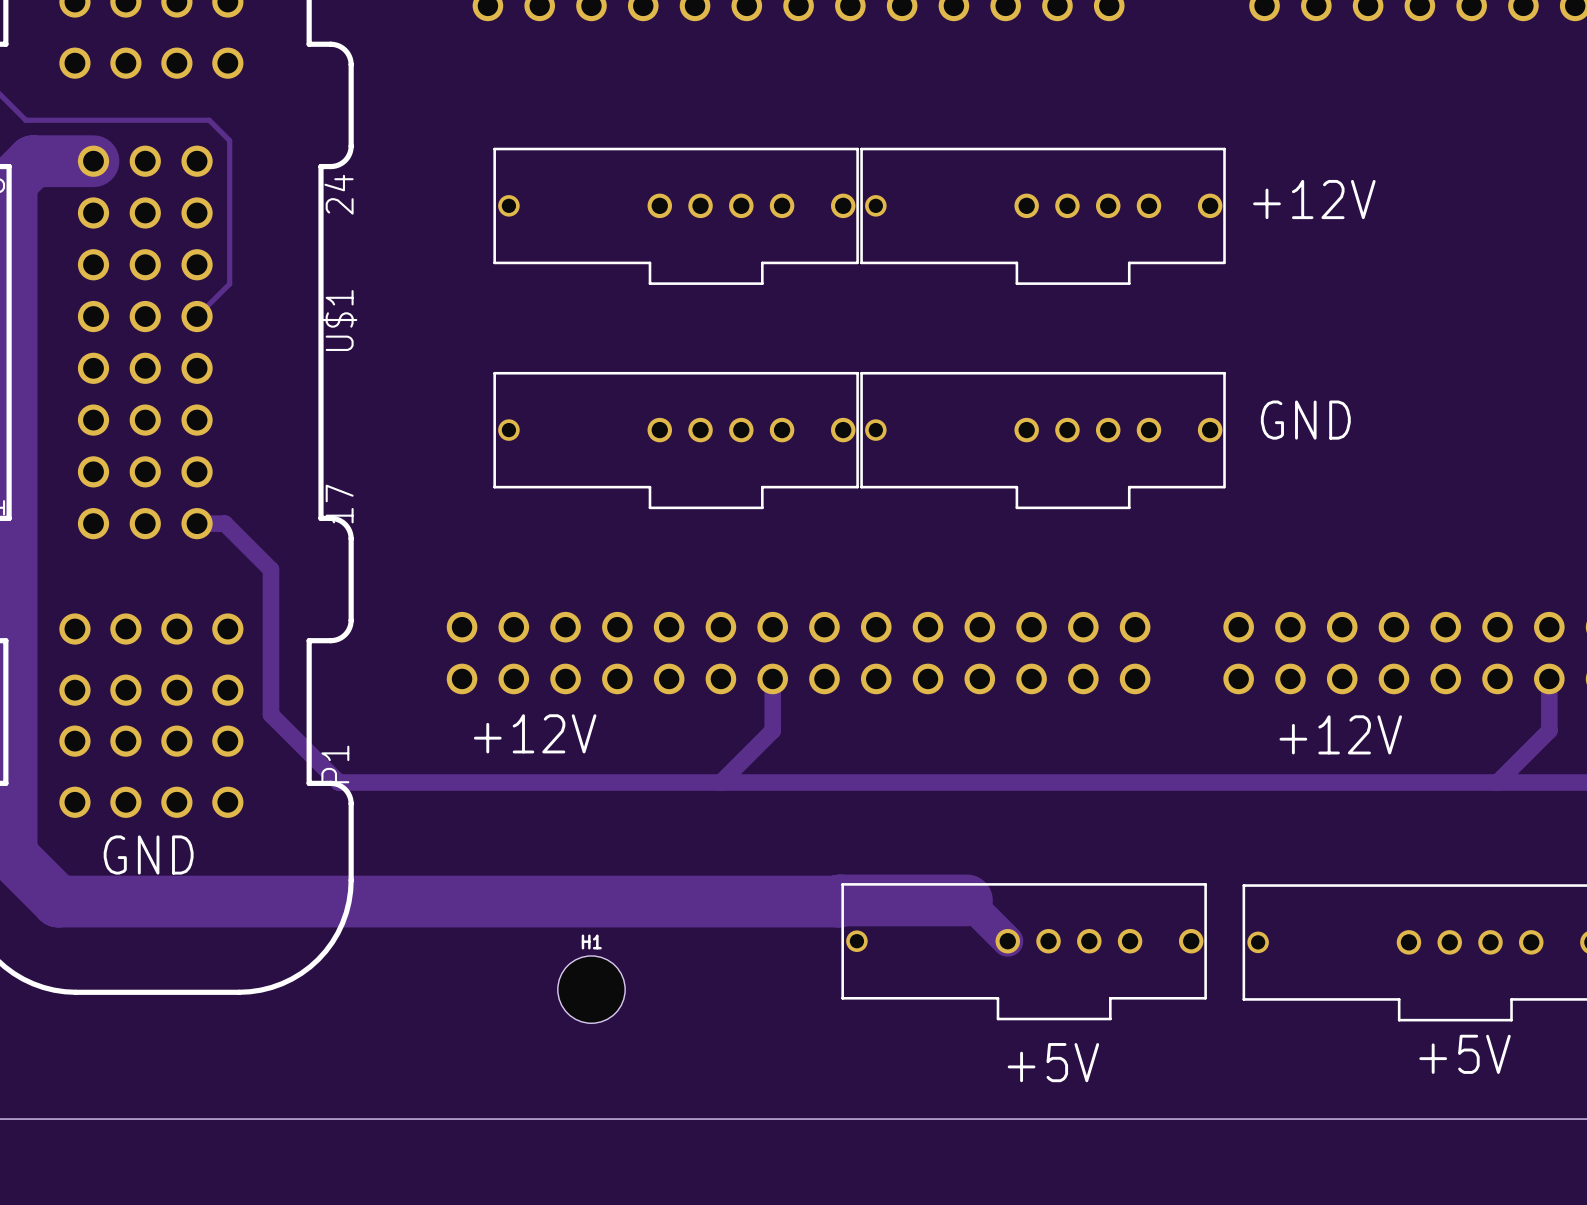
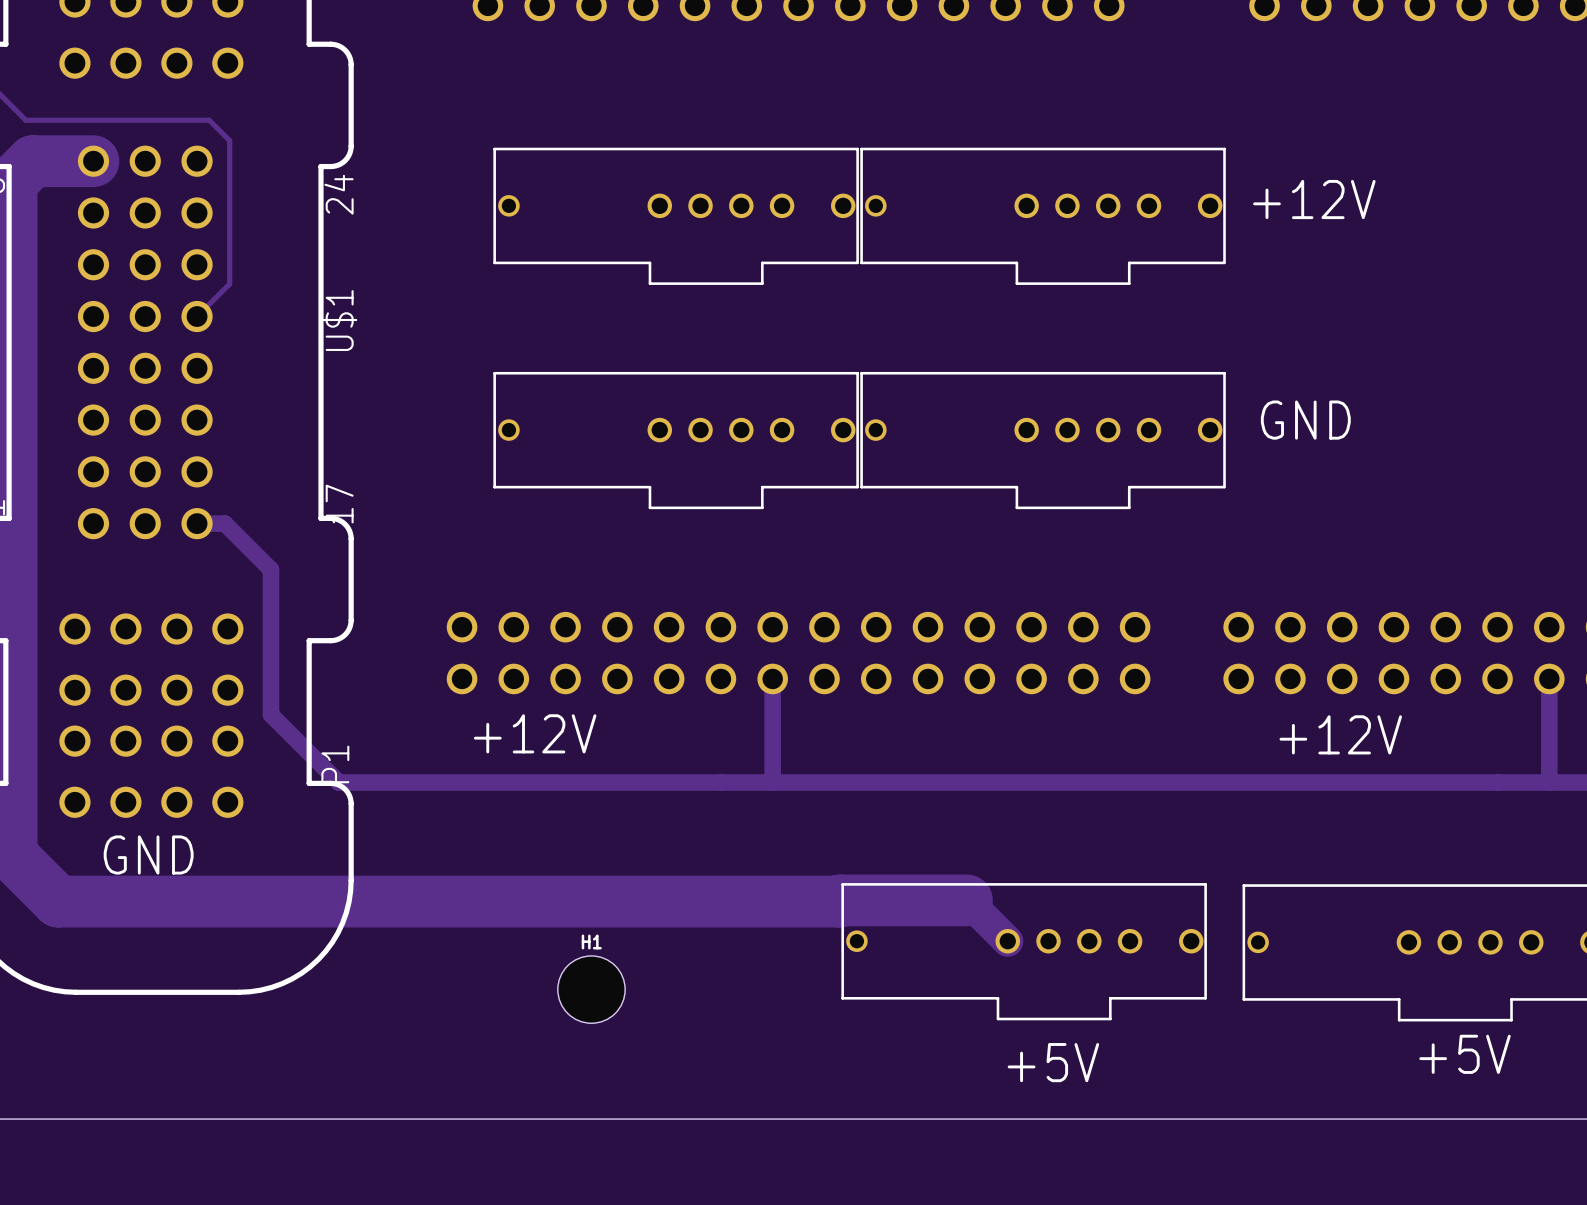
track: (772, 730) (720, 782) -> (772, 730) (772, 780) (771, 782)
track: (1549, 730) (1497, 782) -> (1549, 730) (1549, 782)

